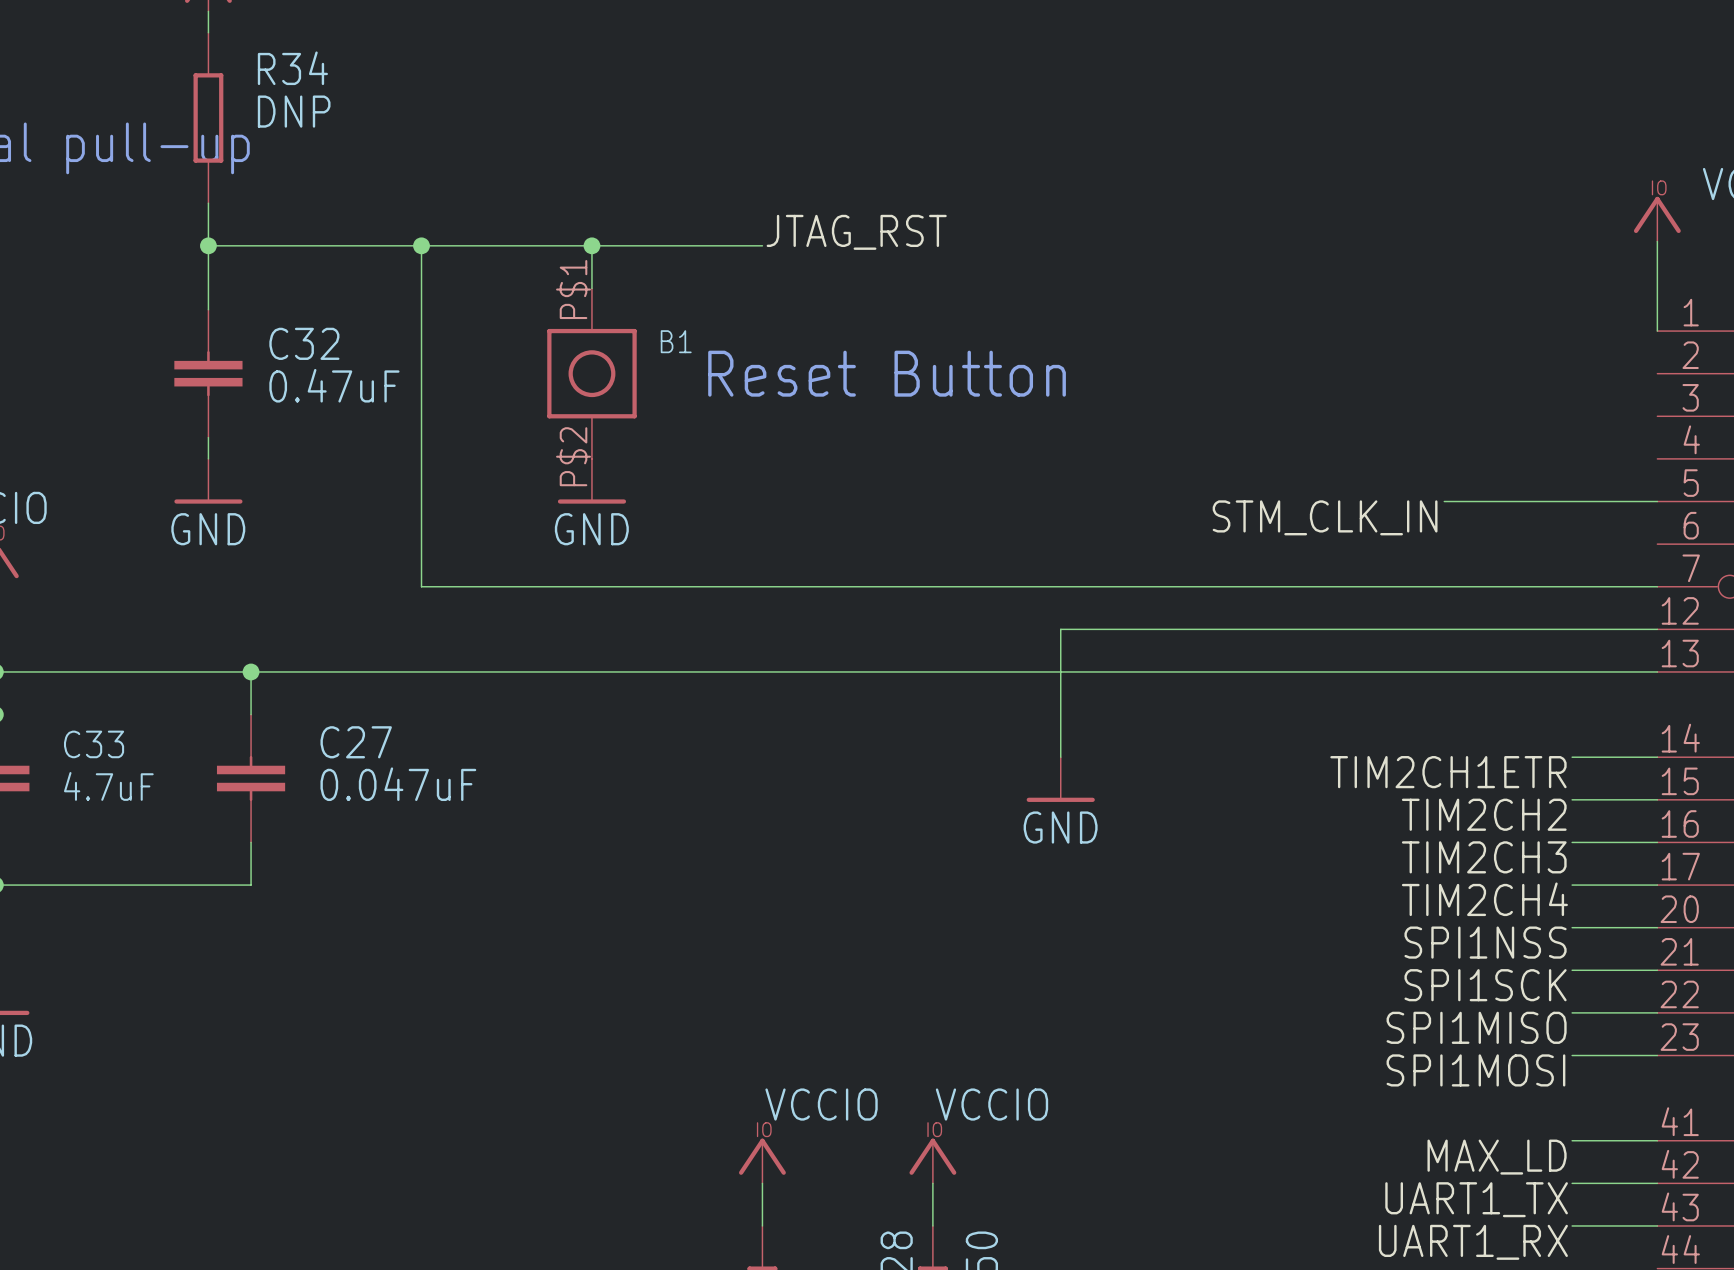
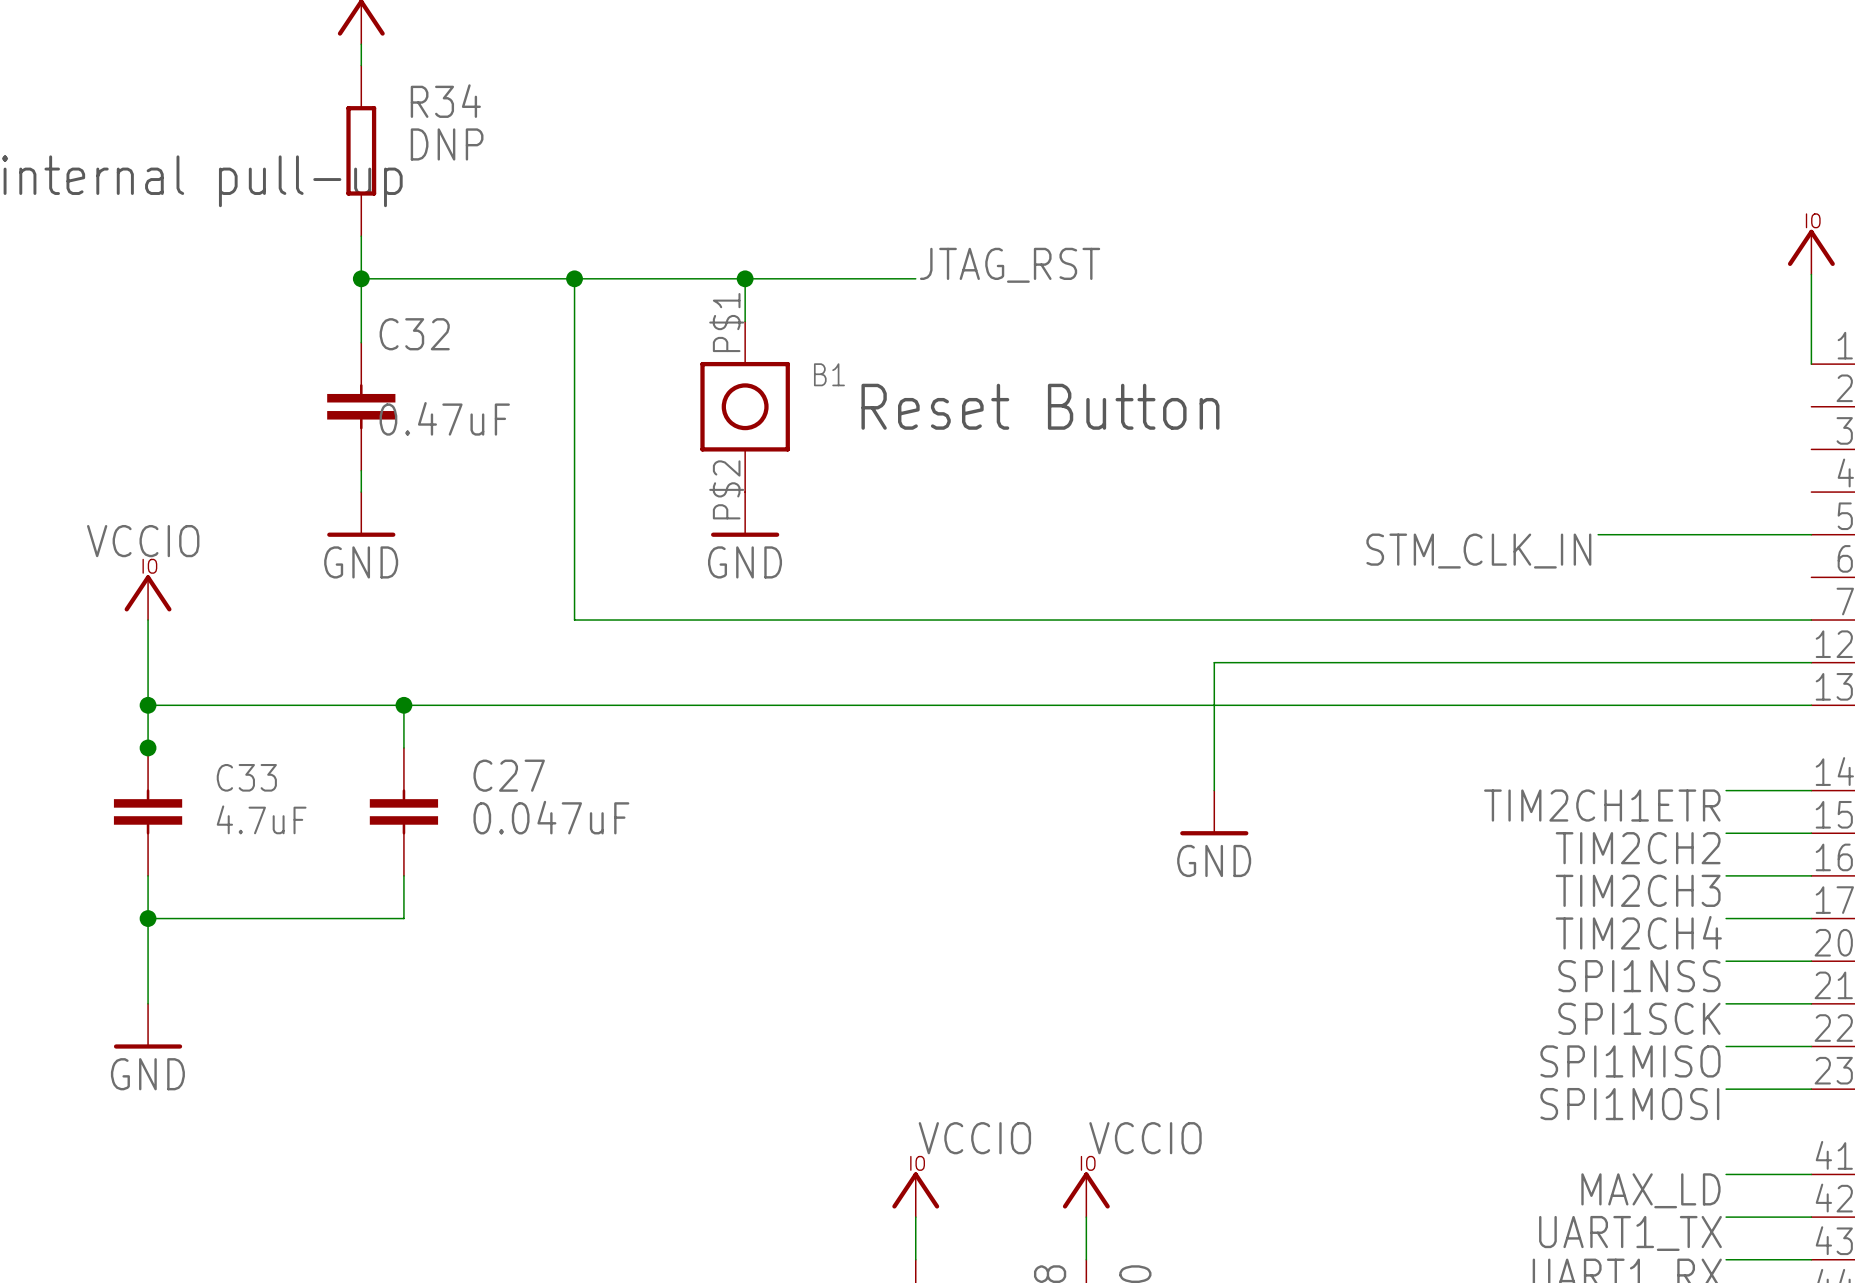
C32 name position: C32 (304, 343) -> C32 (414, 334)
C32 value position: 0.47uF (334, 385) -> 0.47uF (444, 418)

